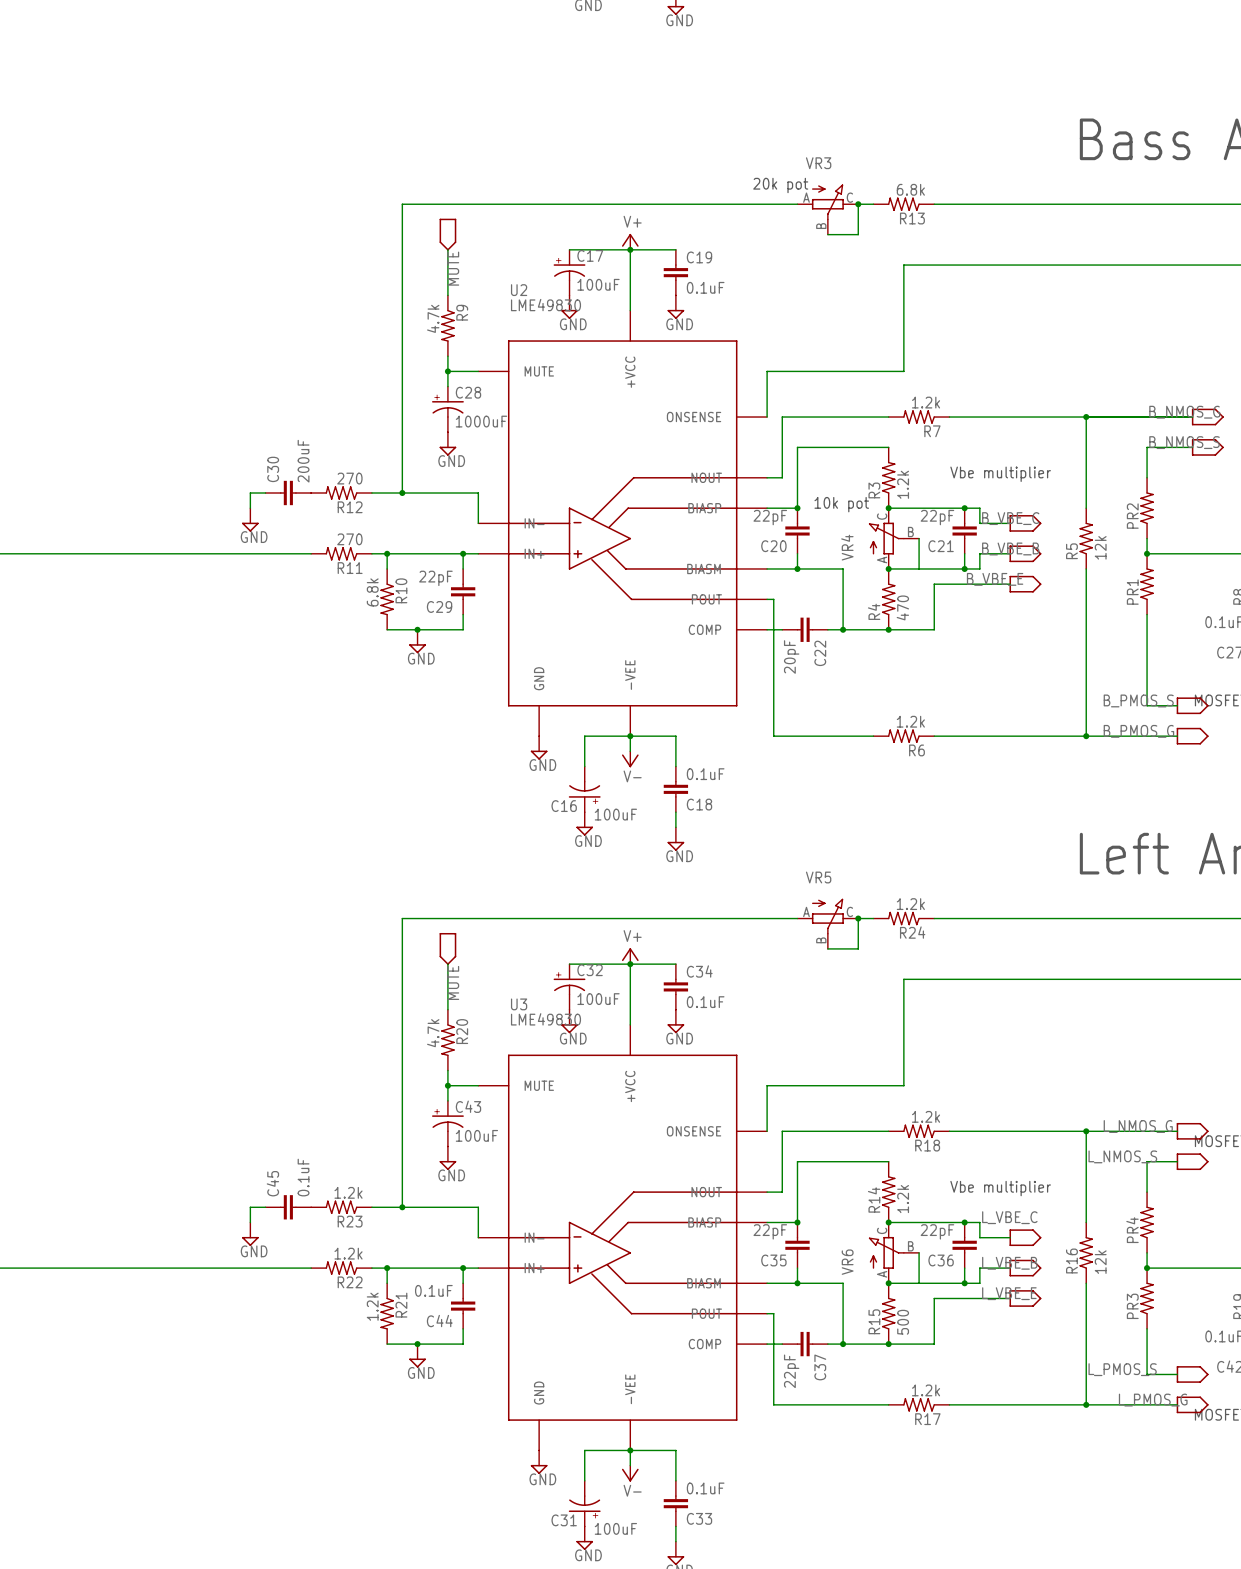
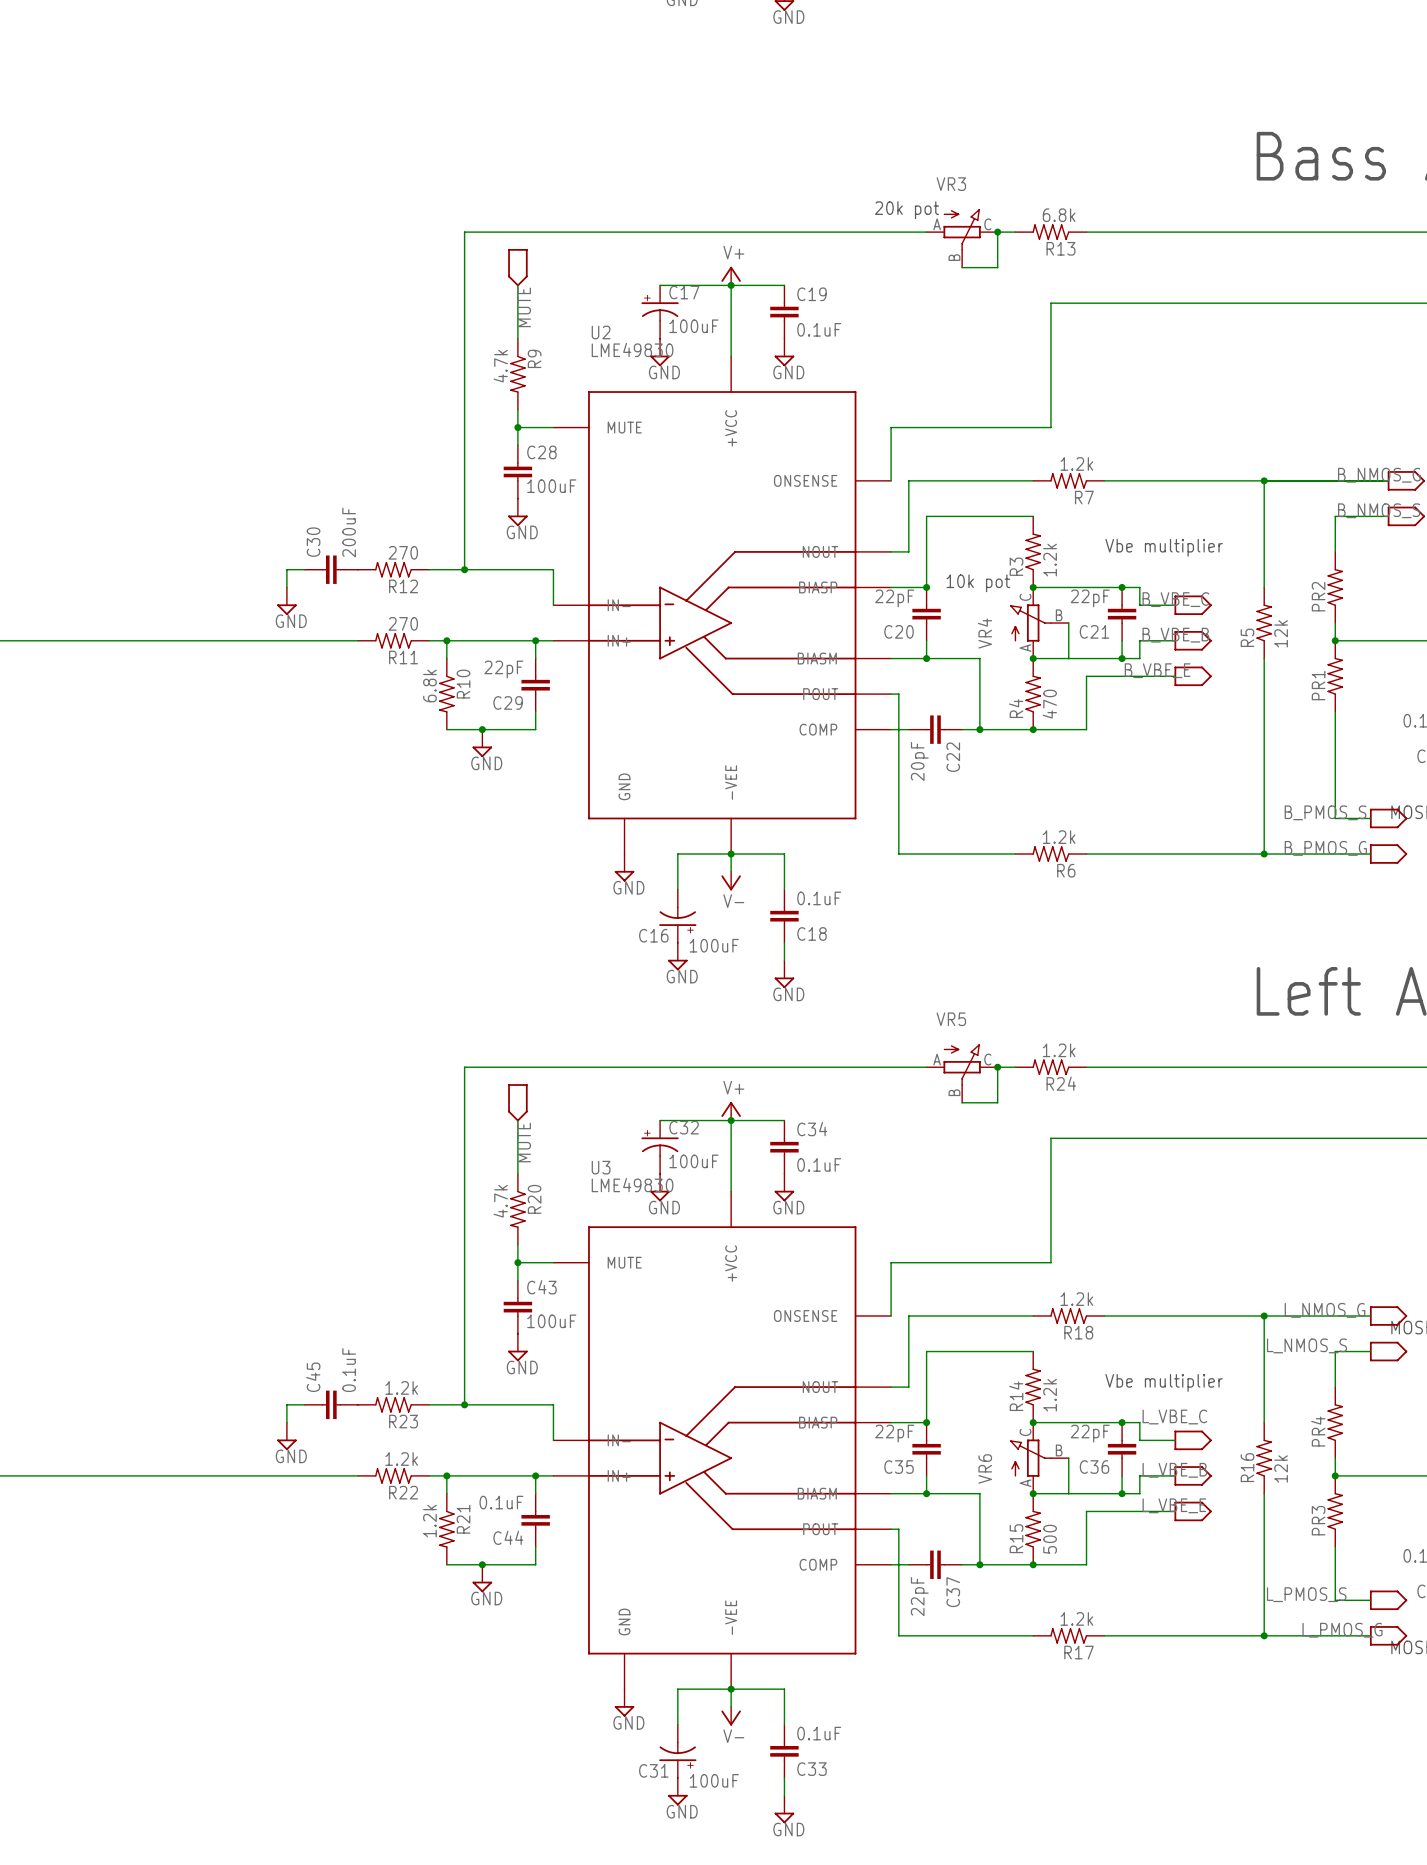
C28 symbol: [431, 386, 464, 433] -> [503, 445, 533, 499]
C28 value: 1000uF (481, 421) -> 100uF (551, 486)
C43 symbol: [431, 1100, 464, 1147] -> [503, 1280, 533, 1334]

